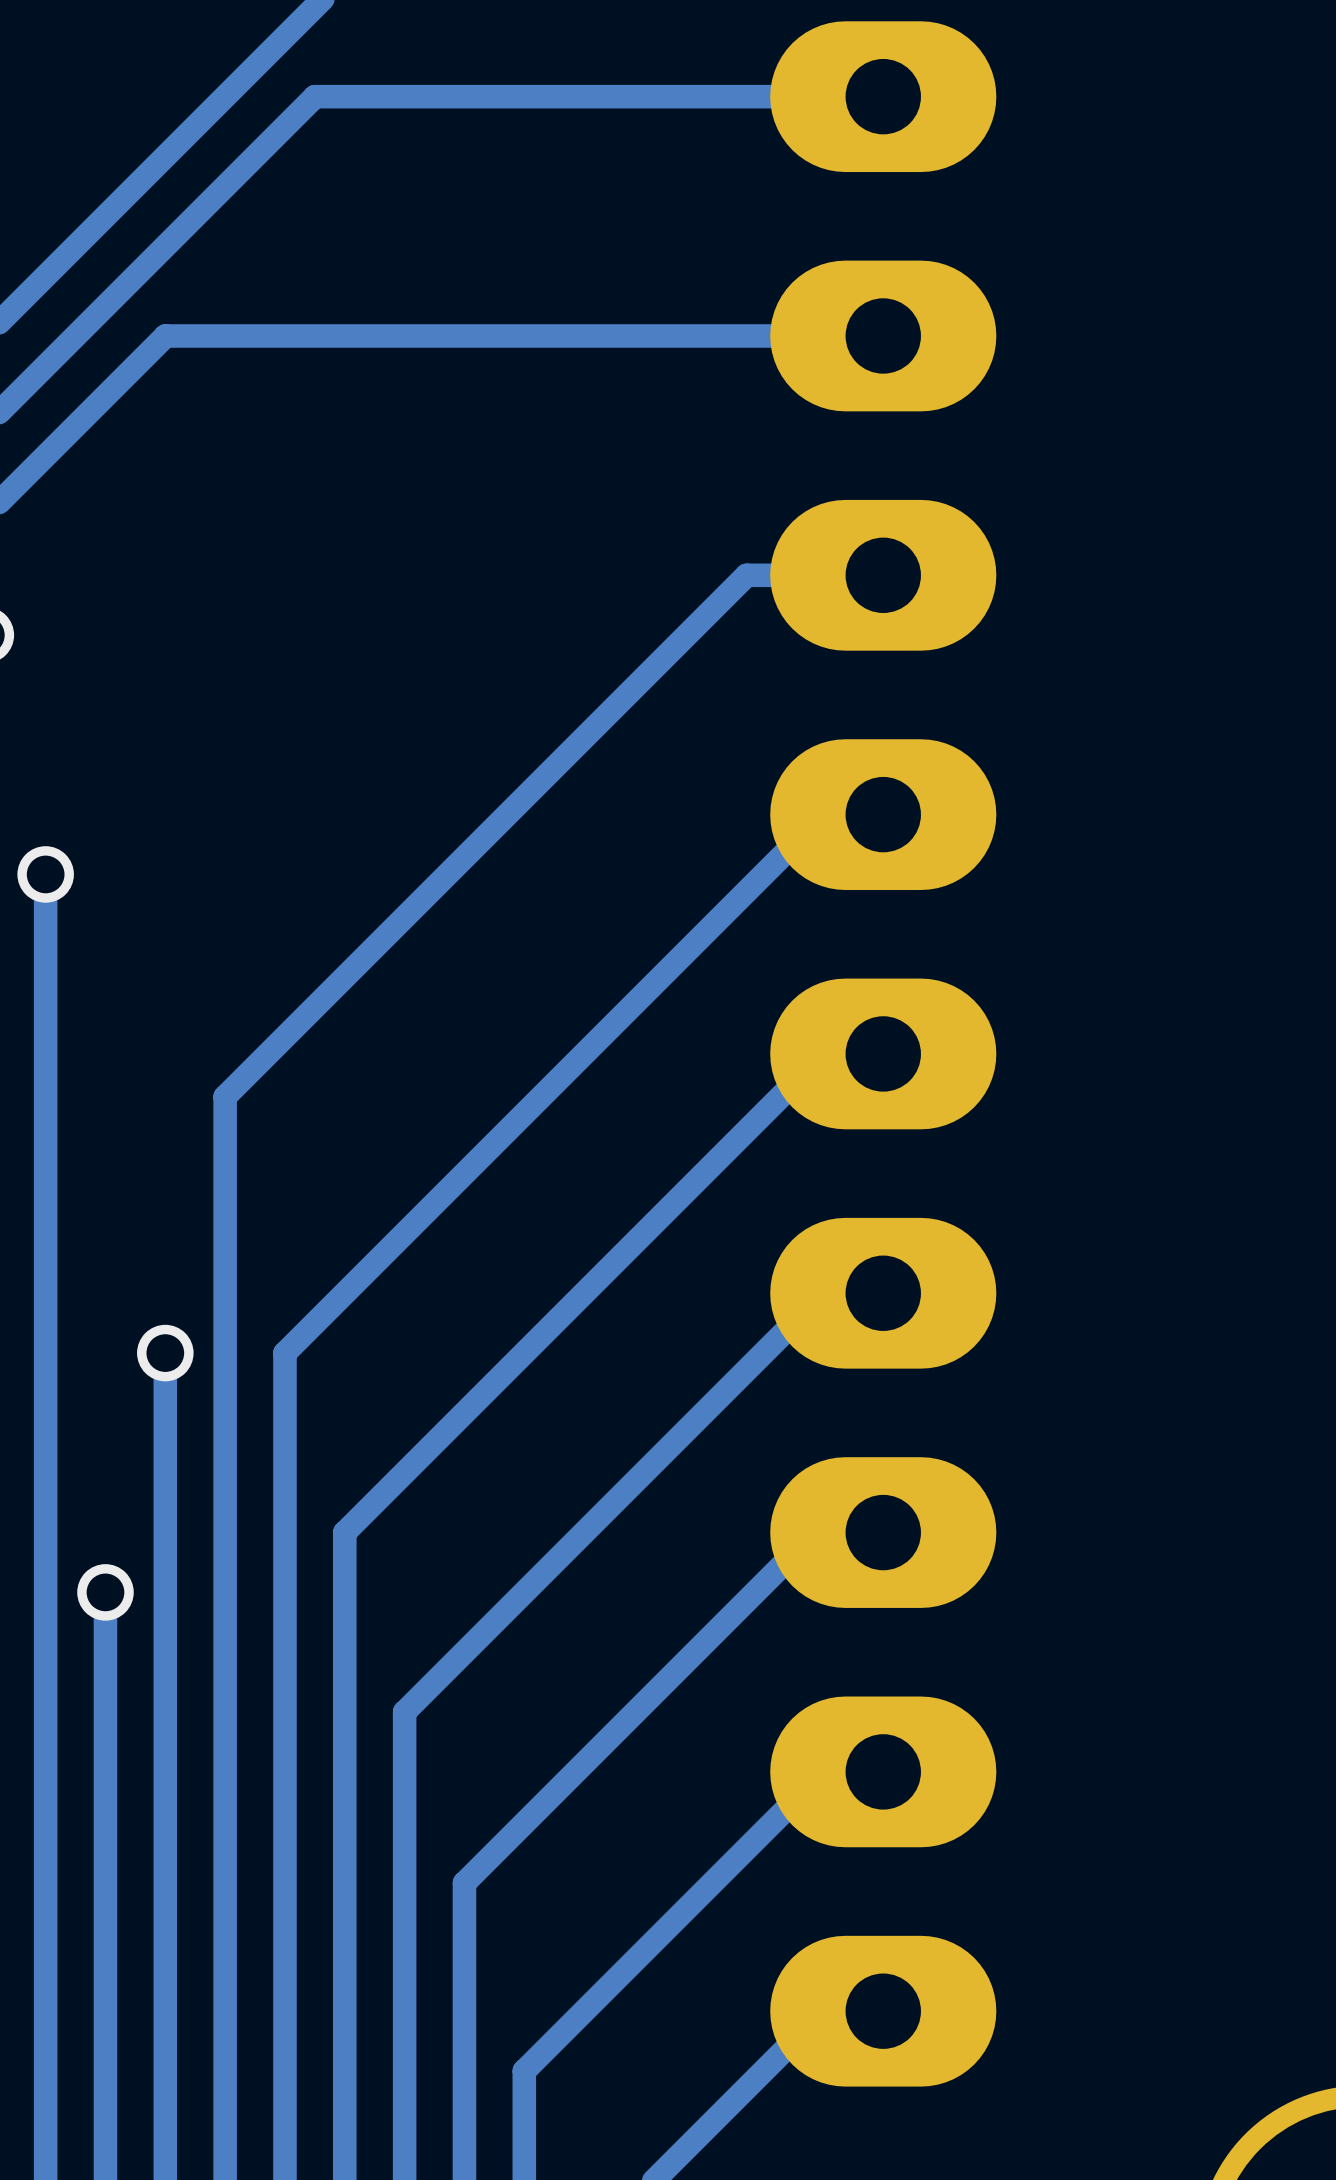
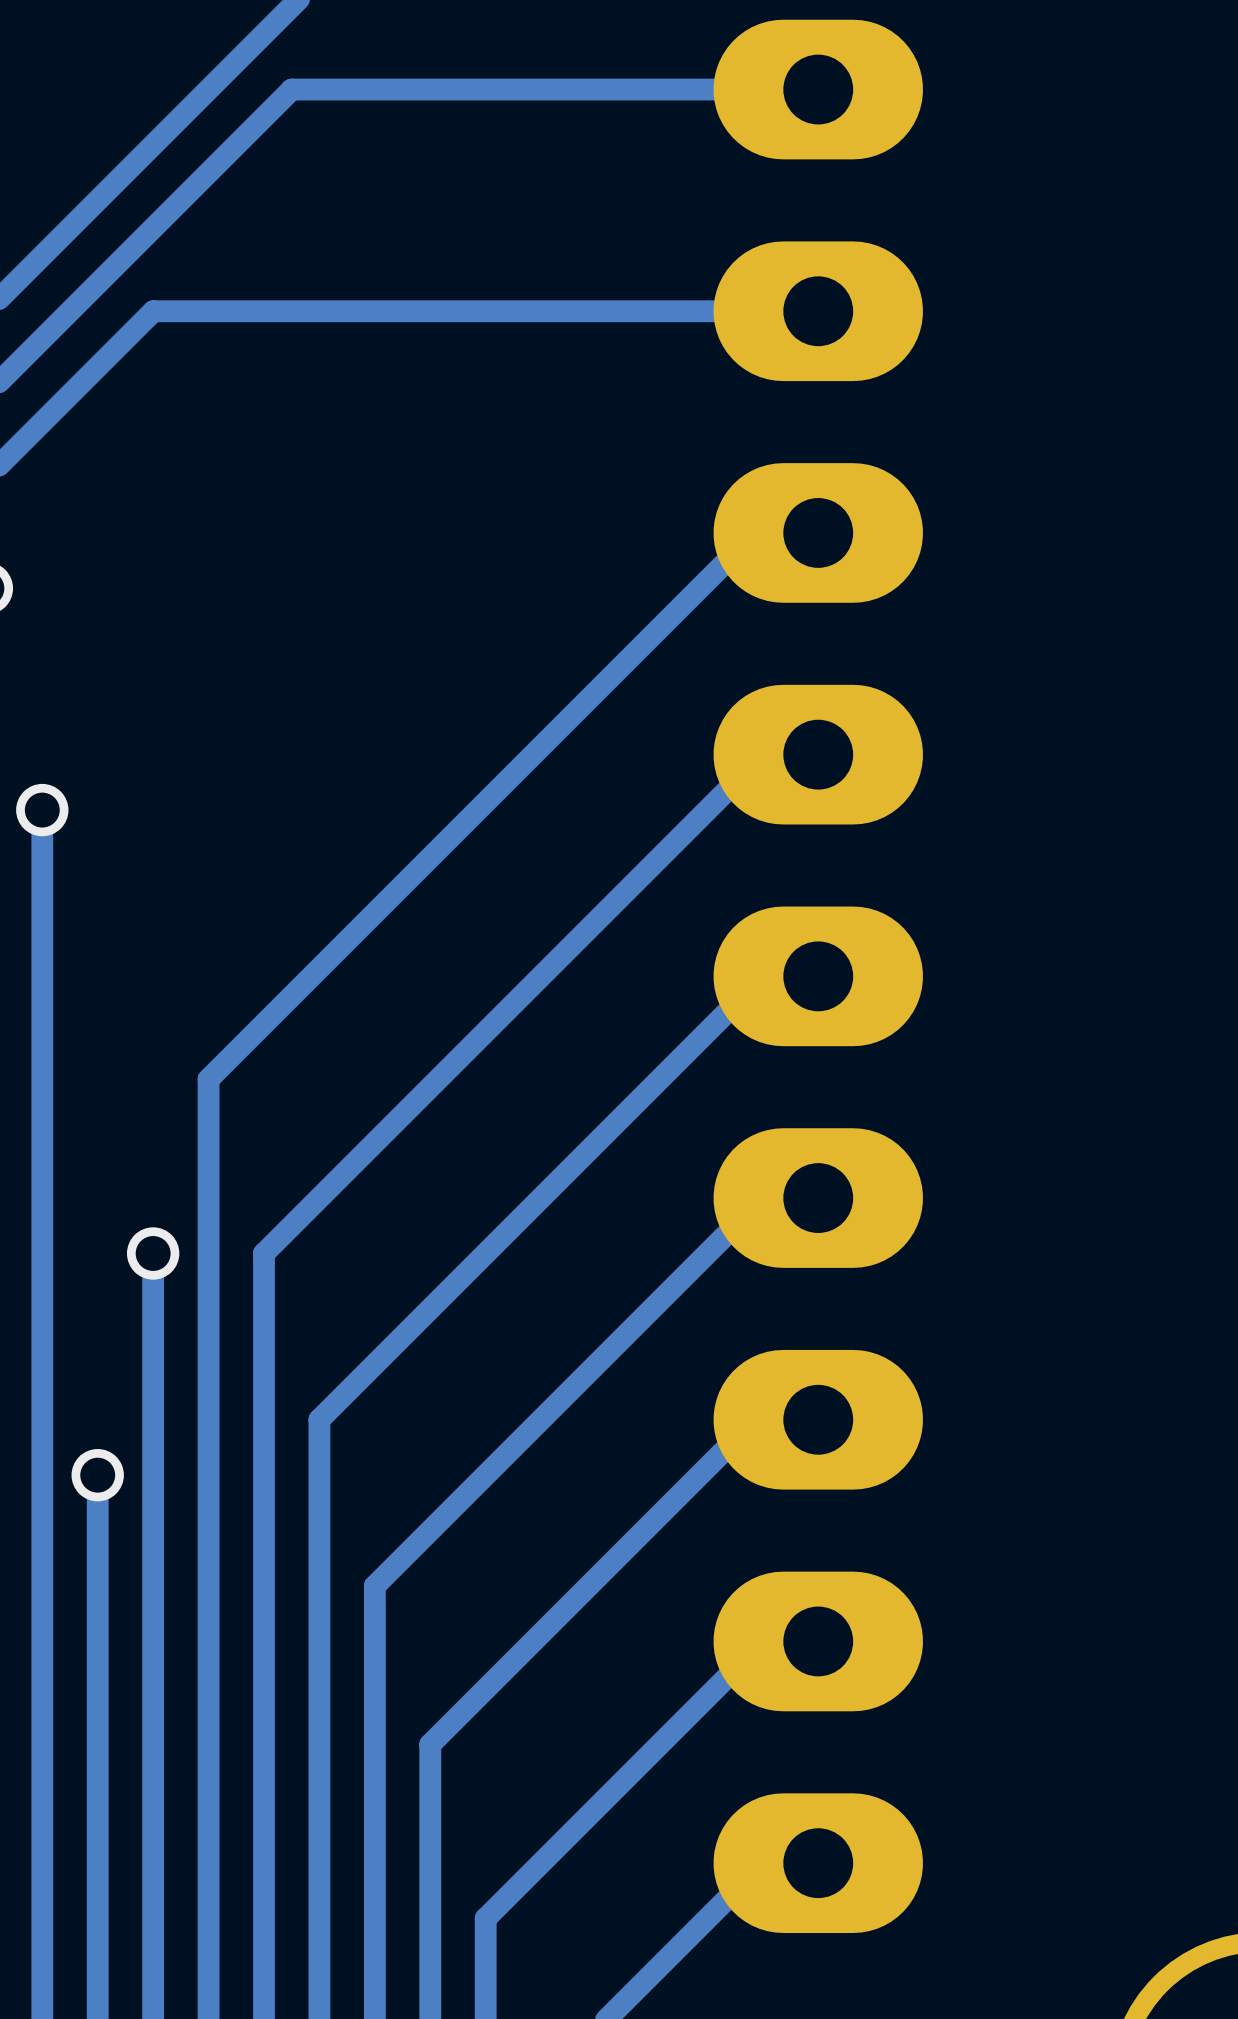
track: (814, 575) (746, 575) (225, 1096) (225, 1165) -> (754, 532) (208, 1079)

